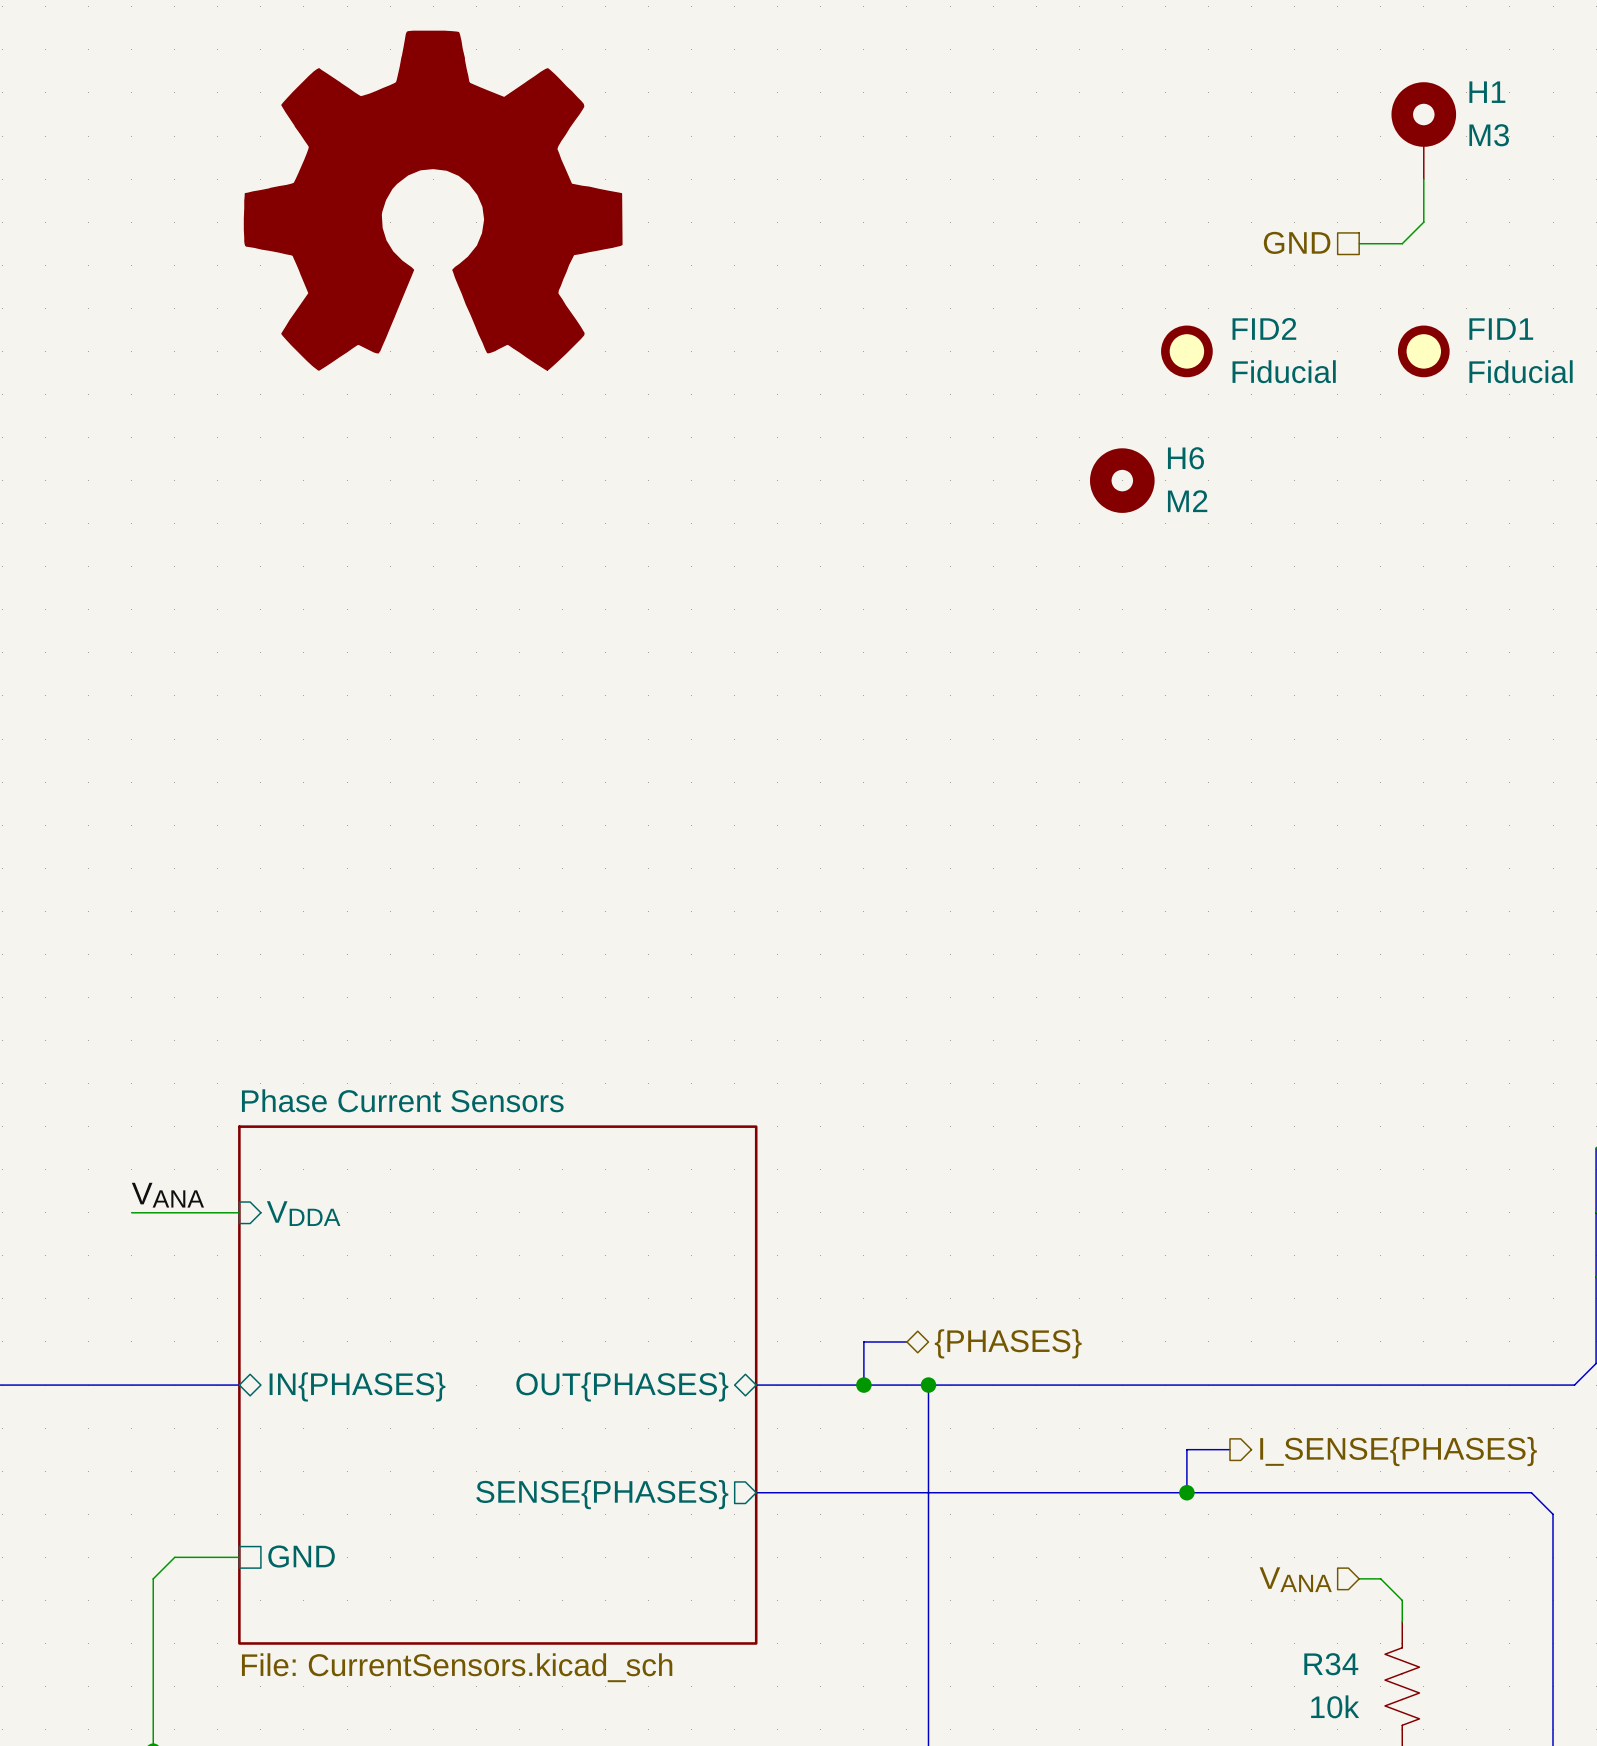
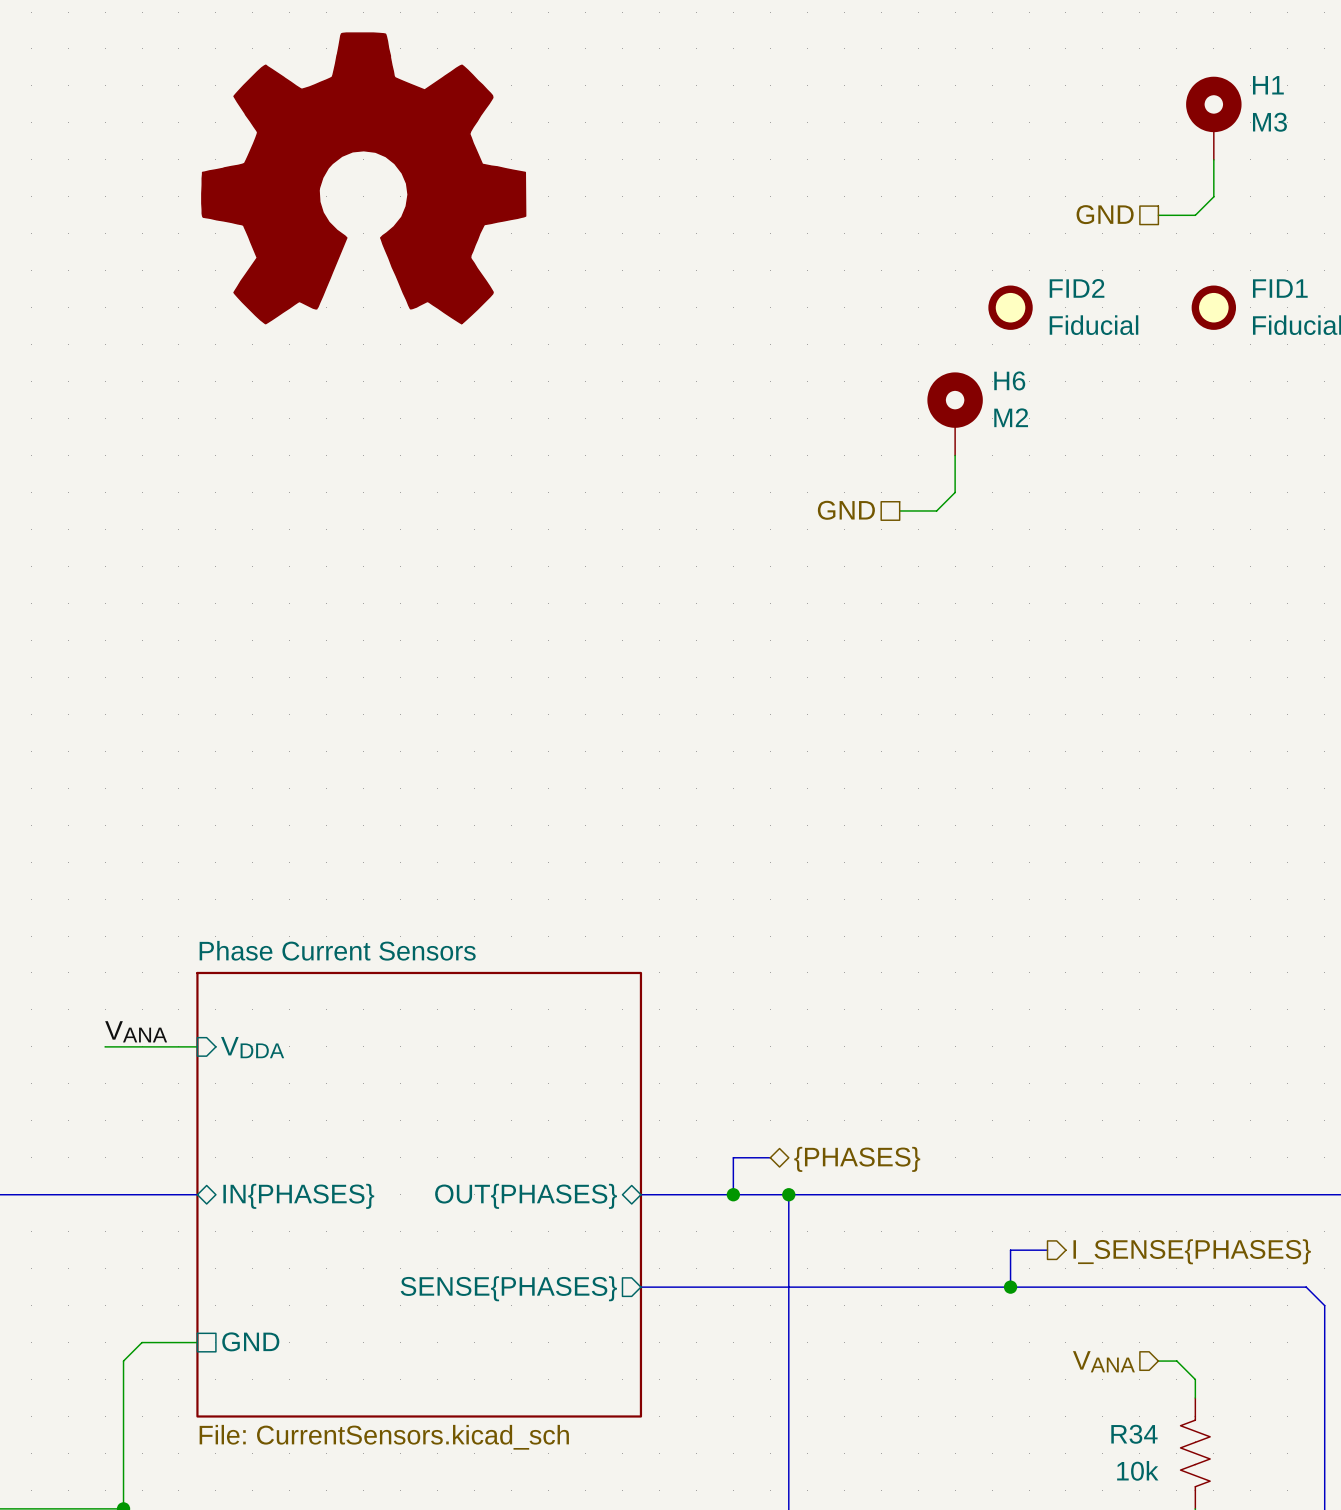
H6 symbol: [1090, 448, 1155, 513] -> [927, 372, 983, 456]
wire: none -> (955, 455) (955, 492) (936, 510) (899, 510)
hierarchical label: none -> GND (846, 510)

